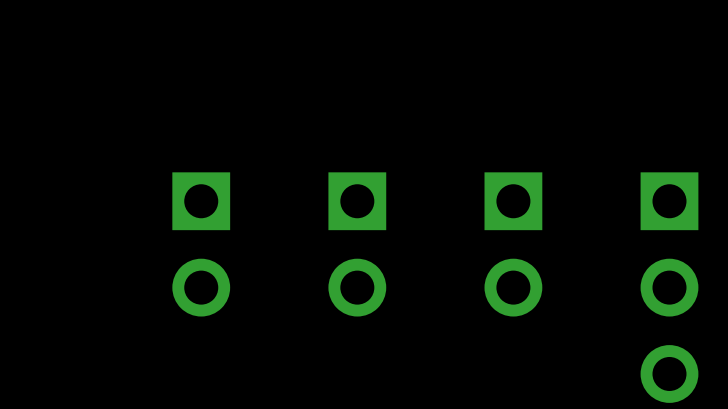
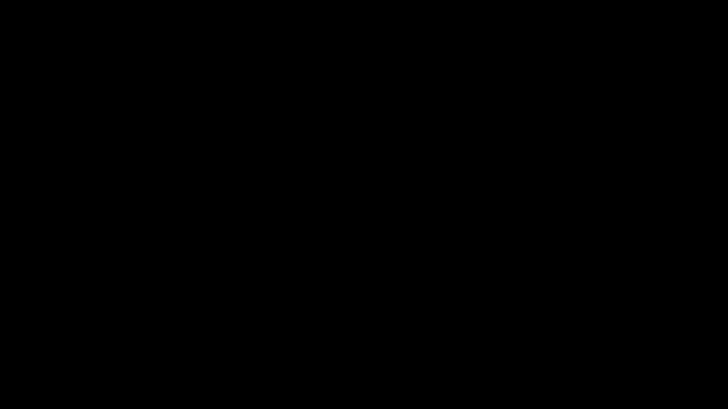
part: (201, 244) -> none
part: (357, 244) -> none
part: (513, 244) -> none
part: (669, 287) -> none

